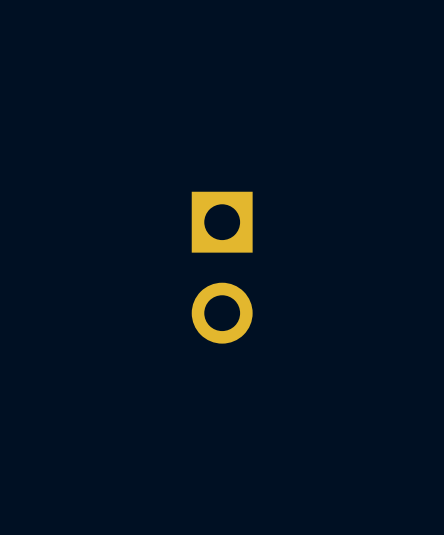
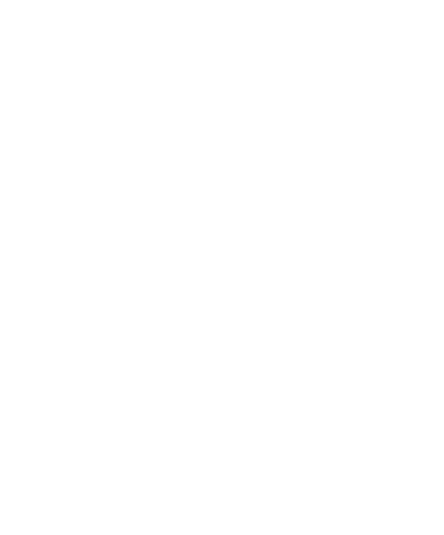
part: (222, 267) -> none

